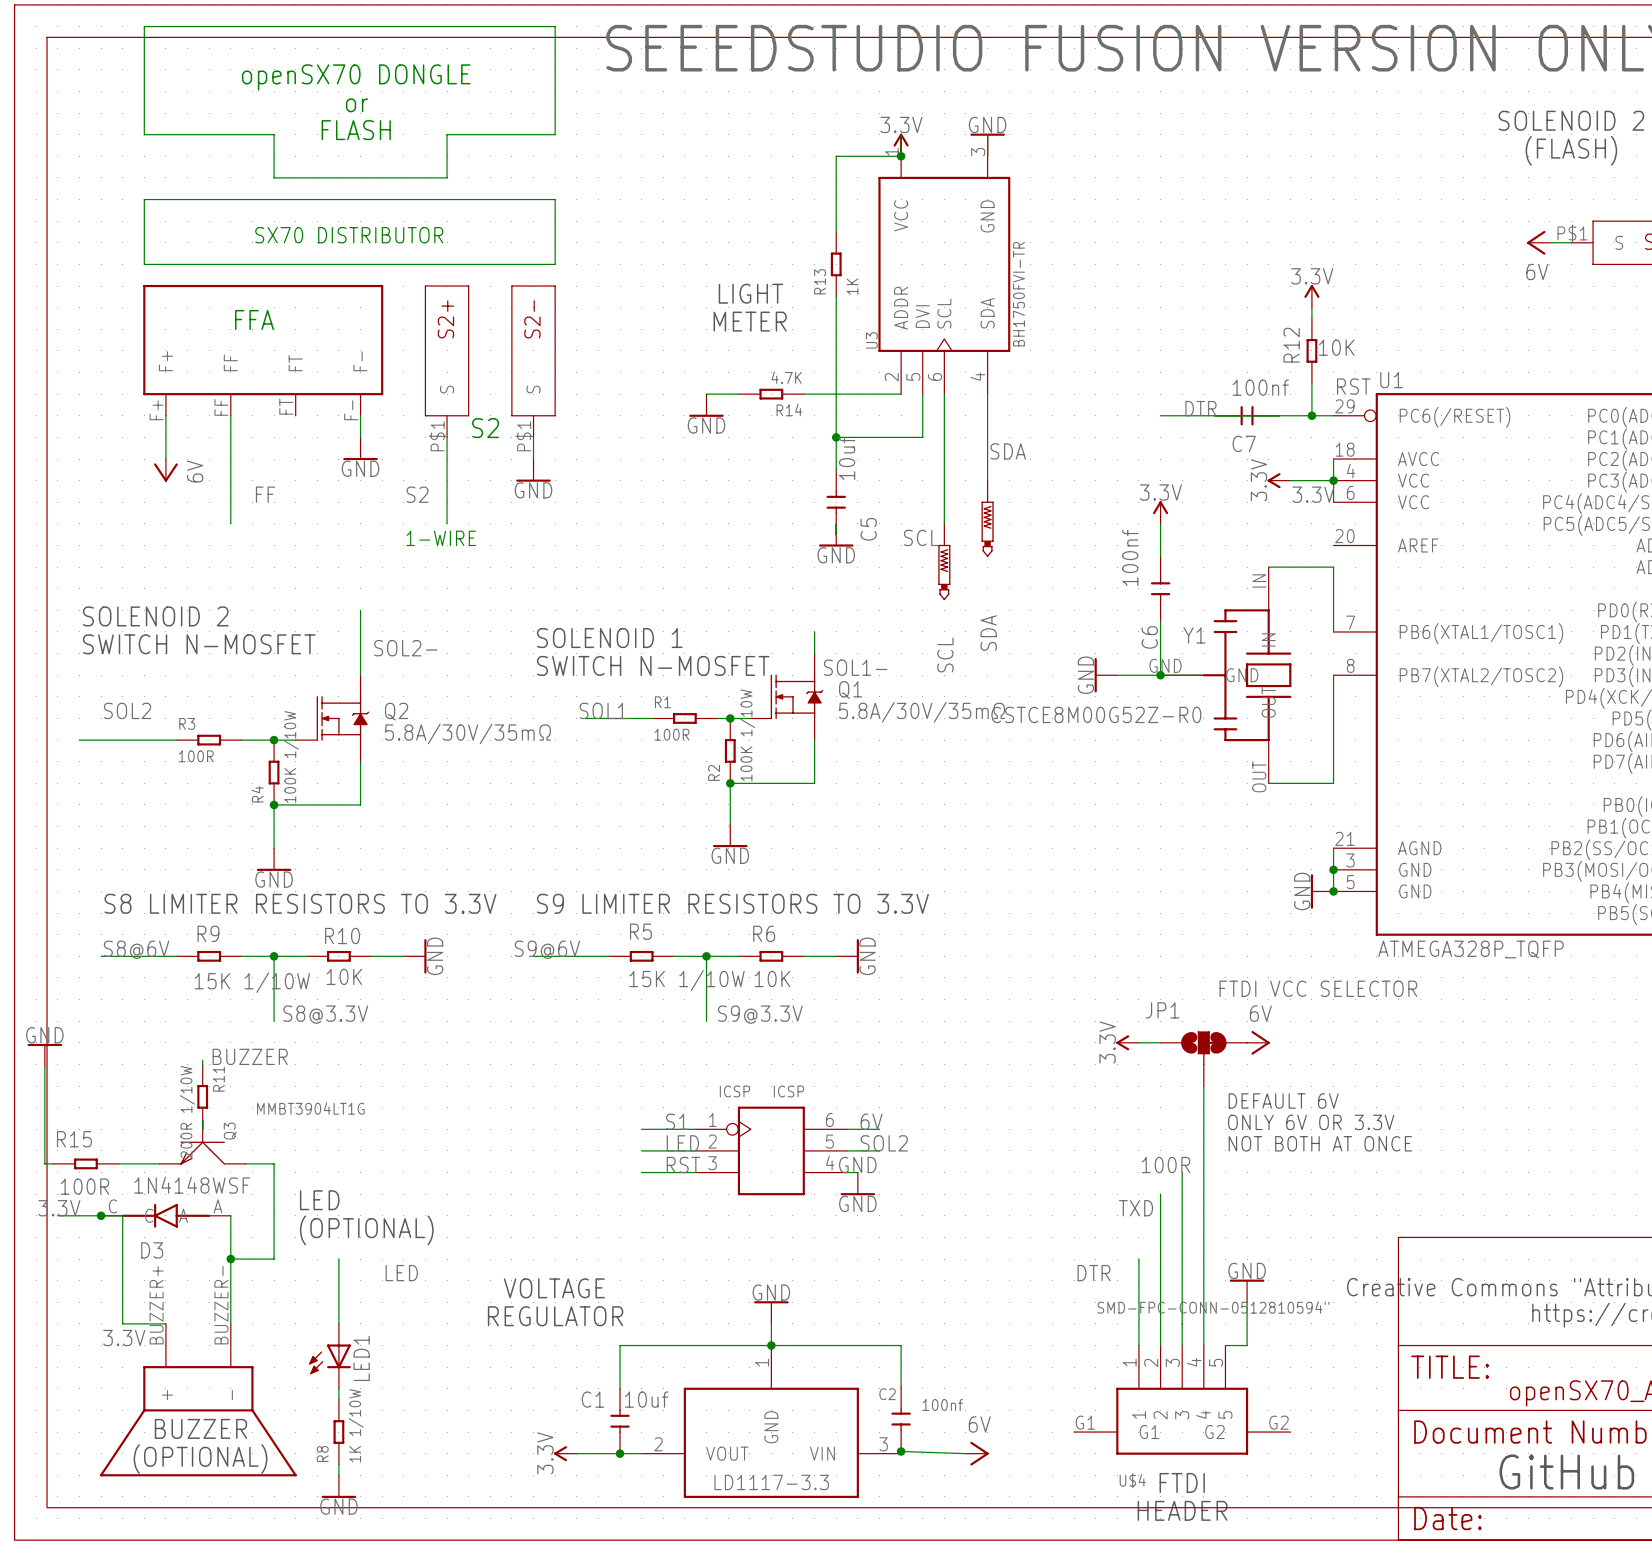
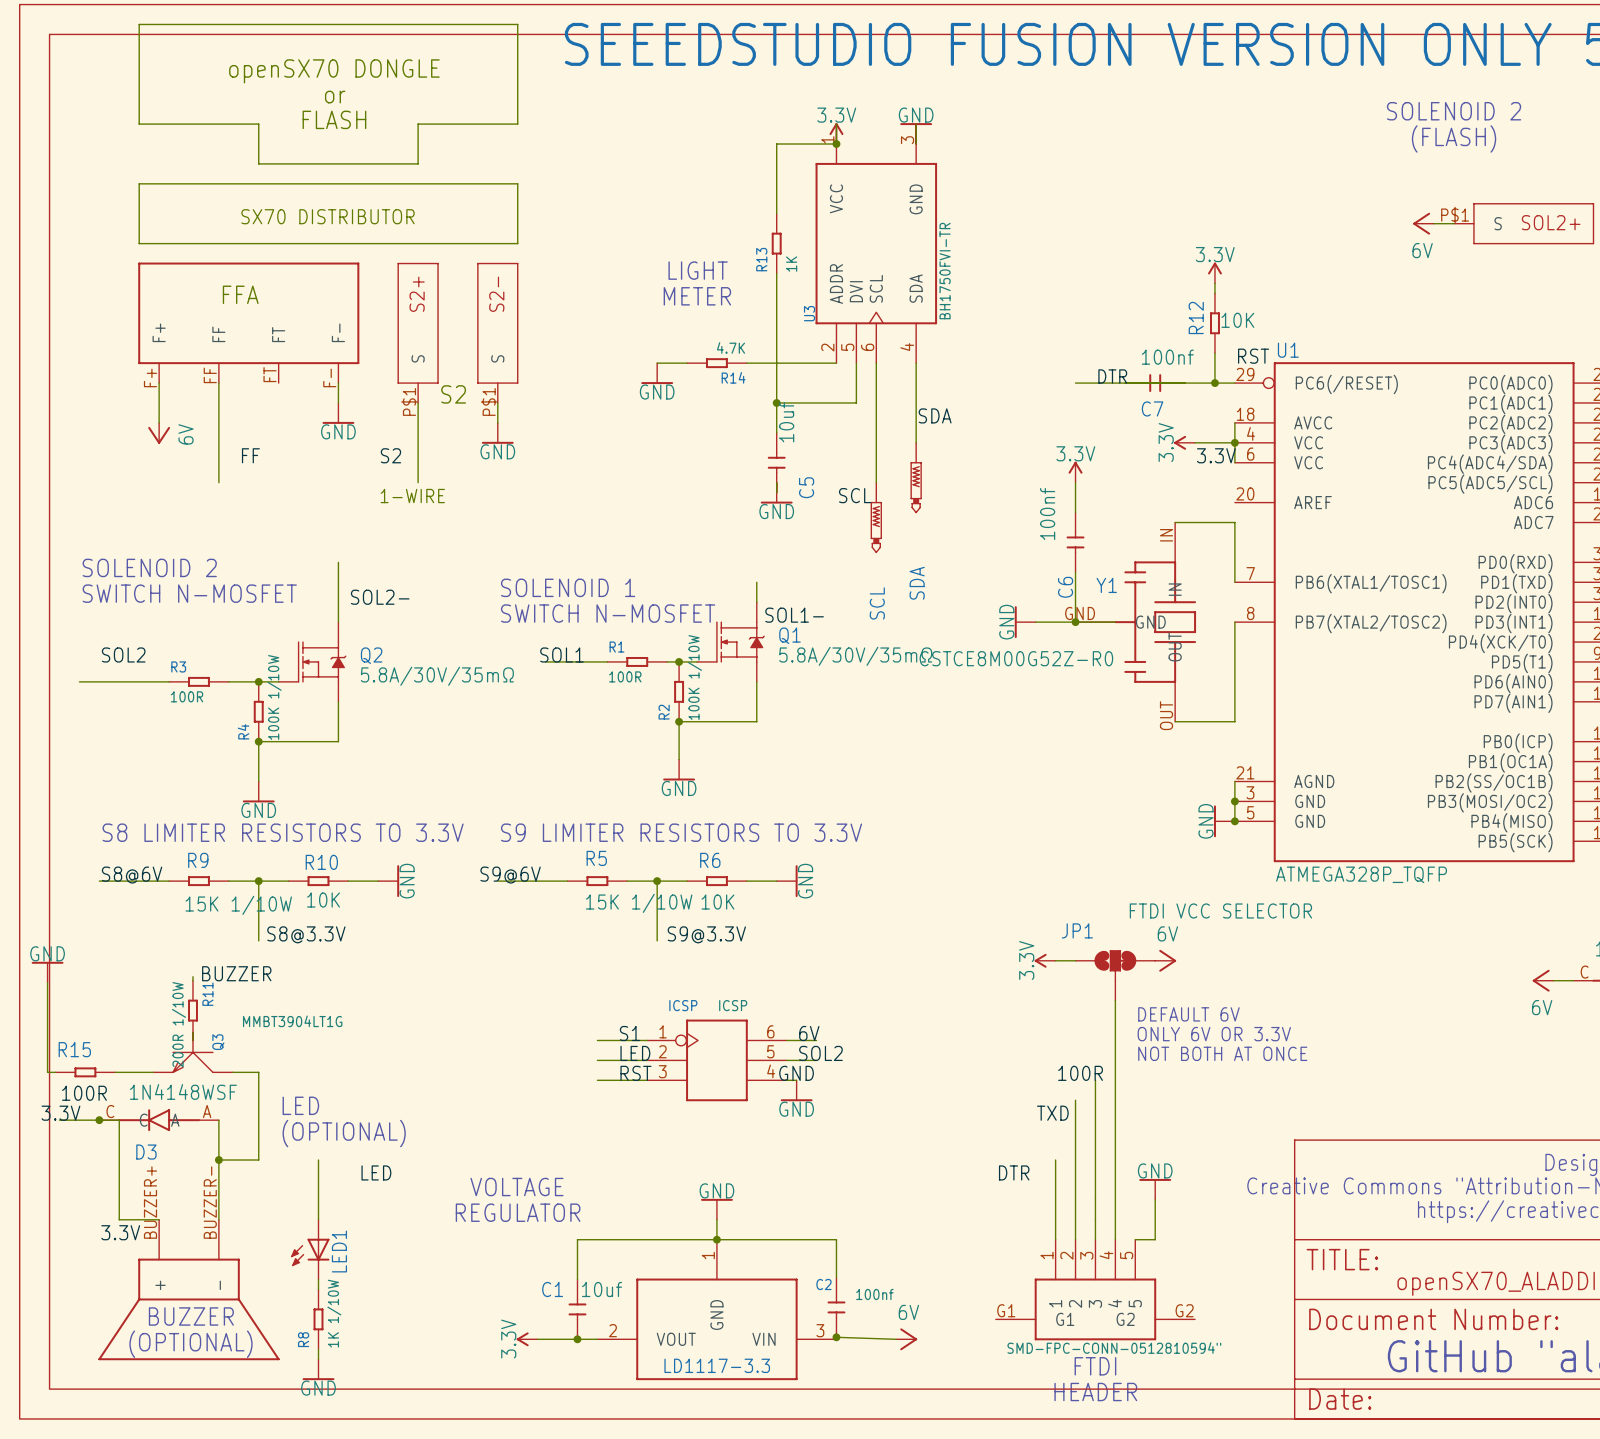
U$4 value position: SMD-FPC-CONN-0512810594" (1213, 1307) -> SMD-FPC-CONN-0512810594" (1114, 1348)
U$4 name: U$4 (1132, 1480) -> none

